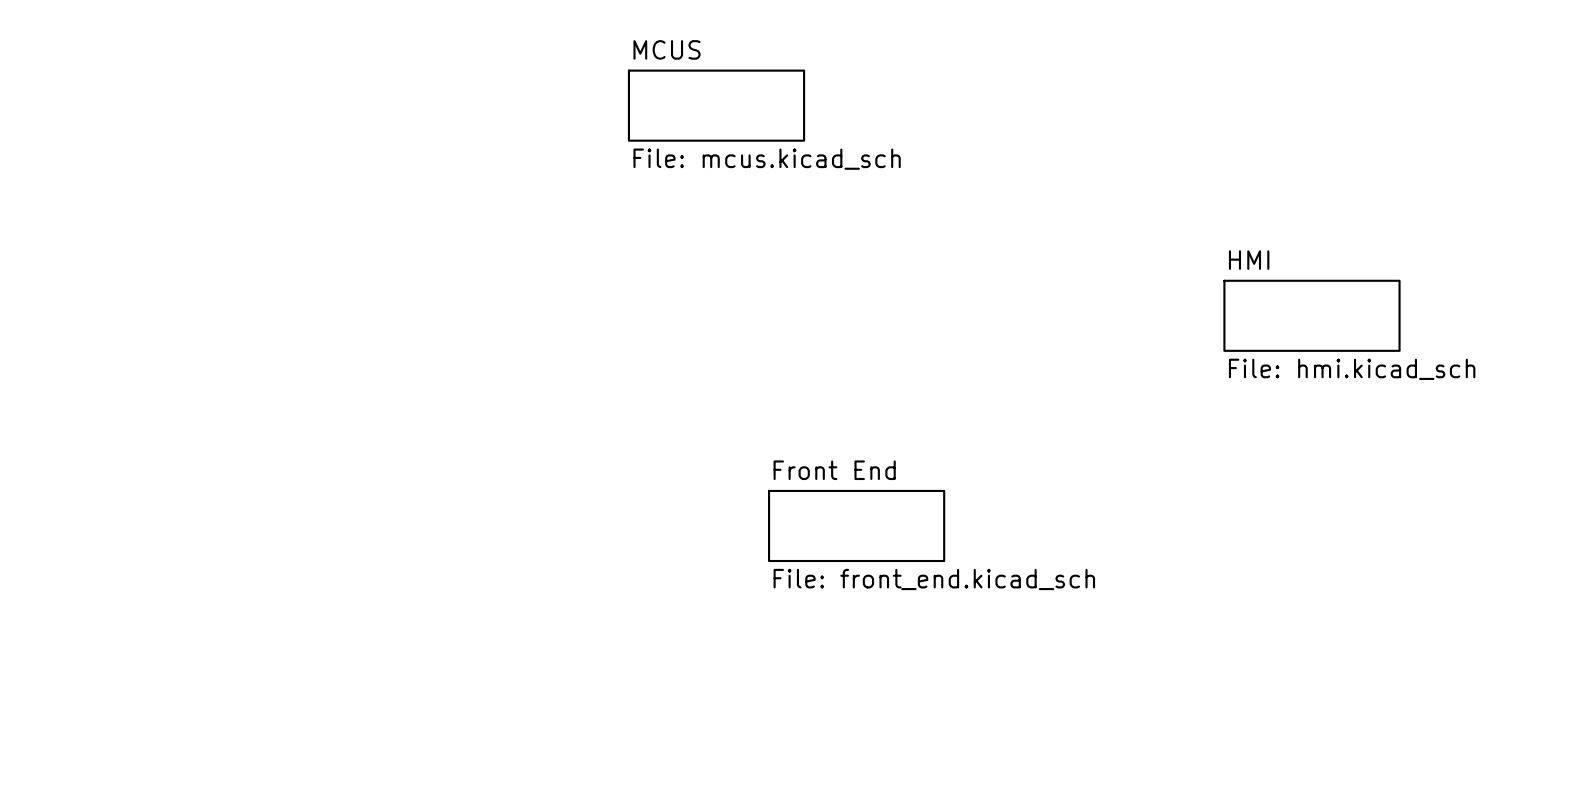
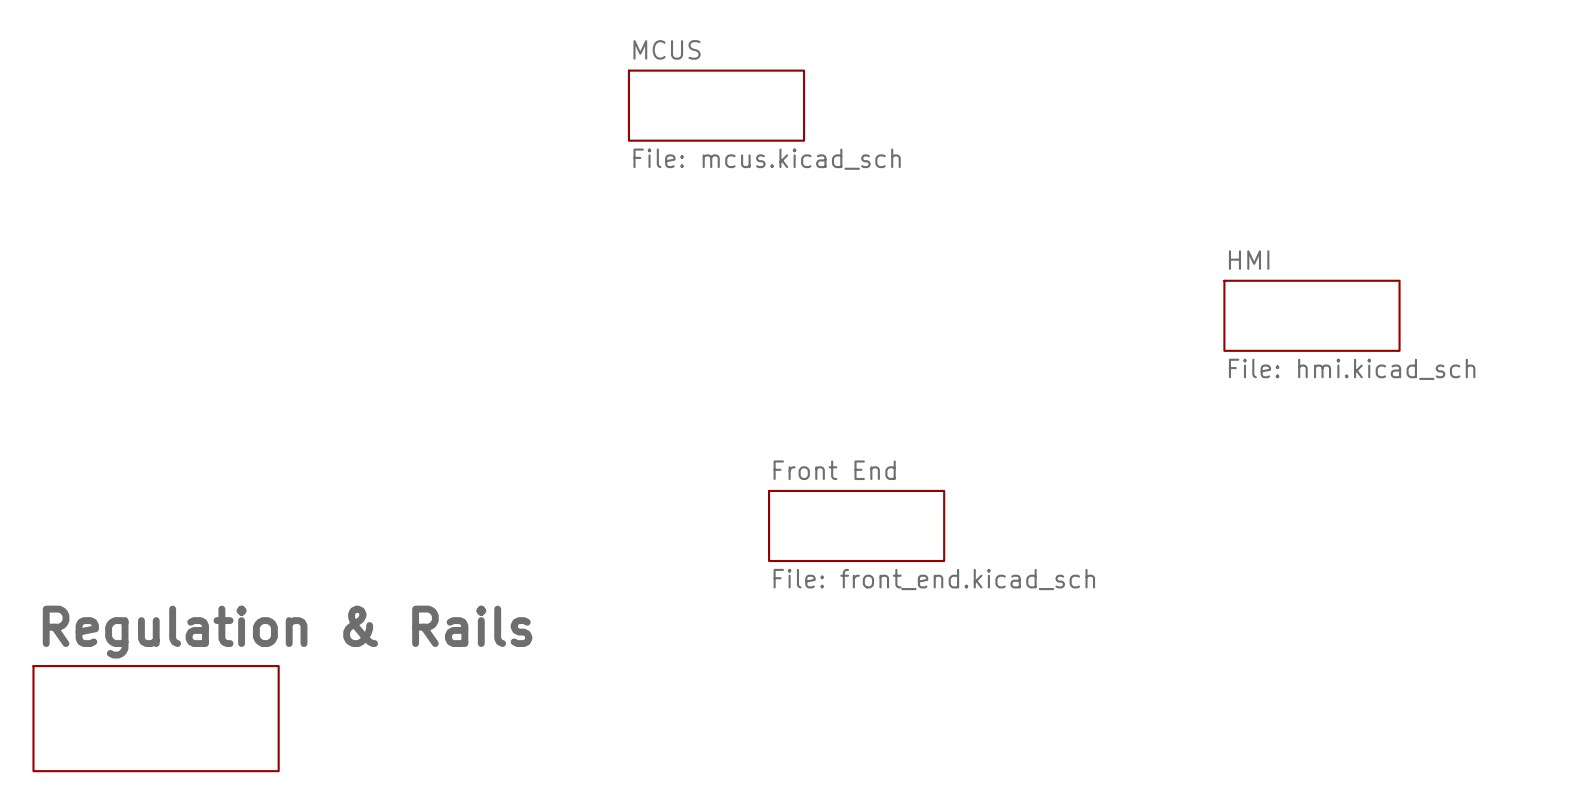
sheet Regulation & Rails: none -> (156, 718)

